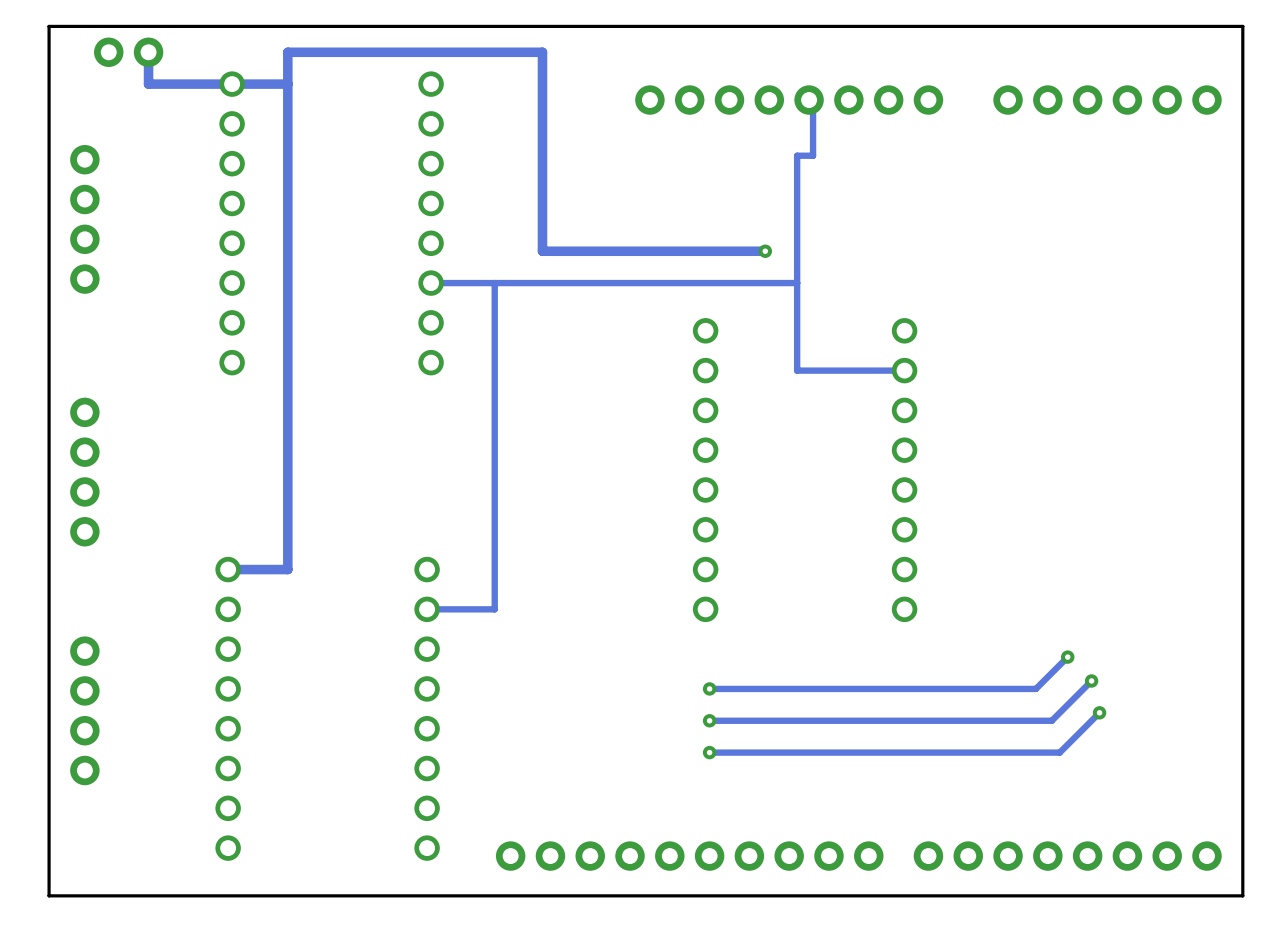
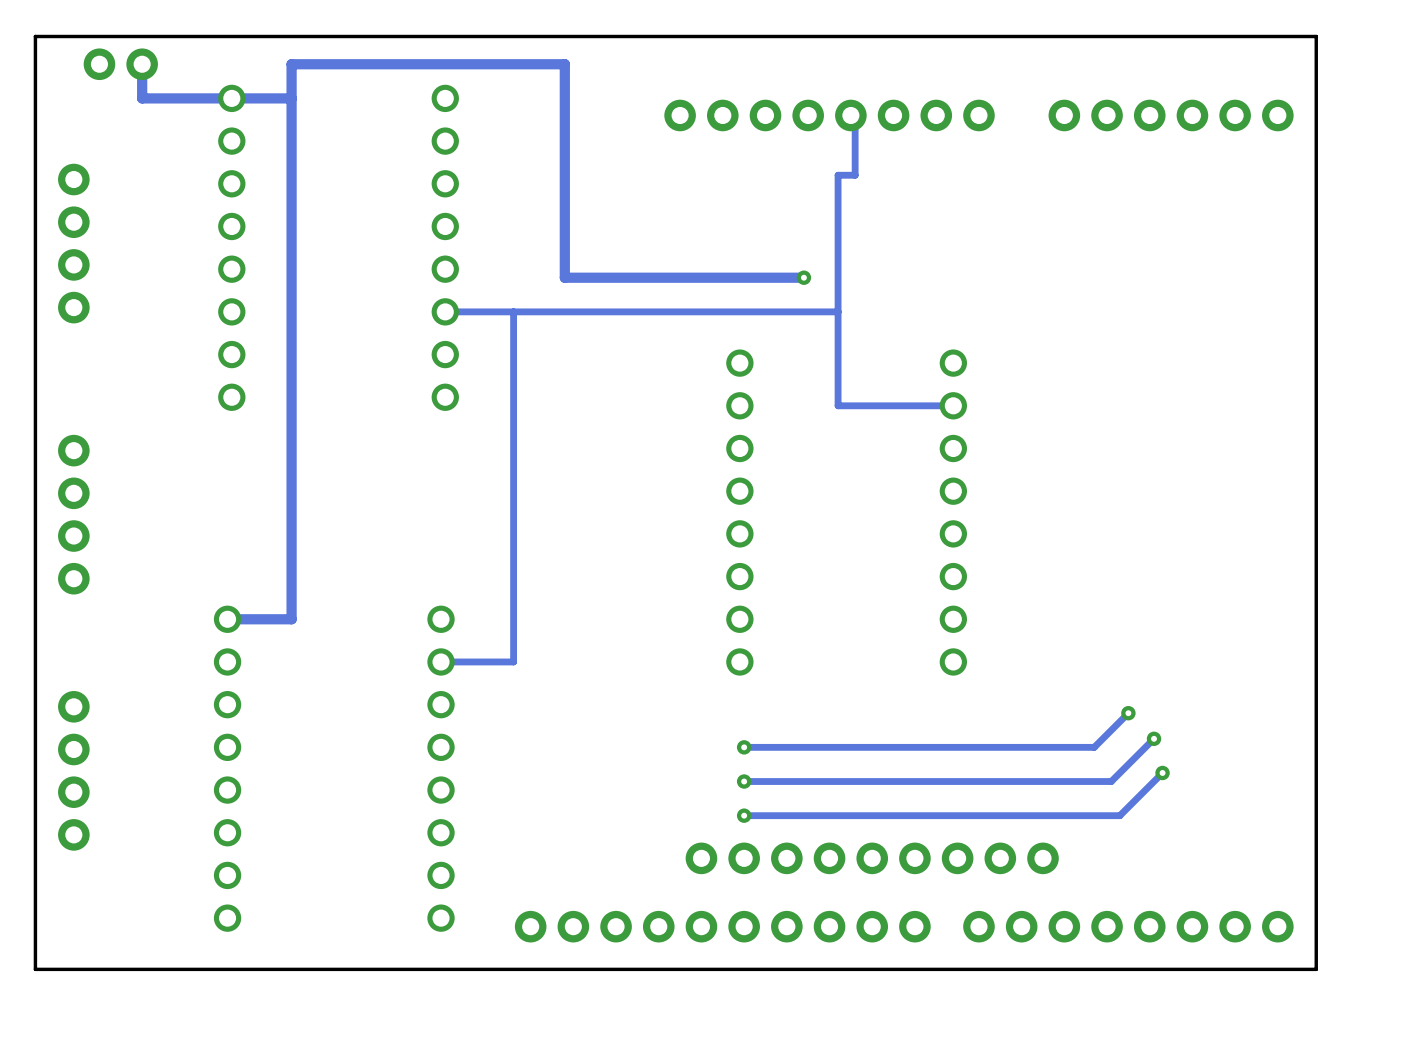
part: none -> (872, 858)

